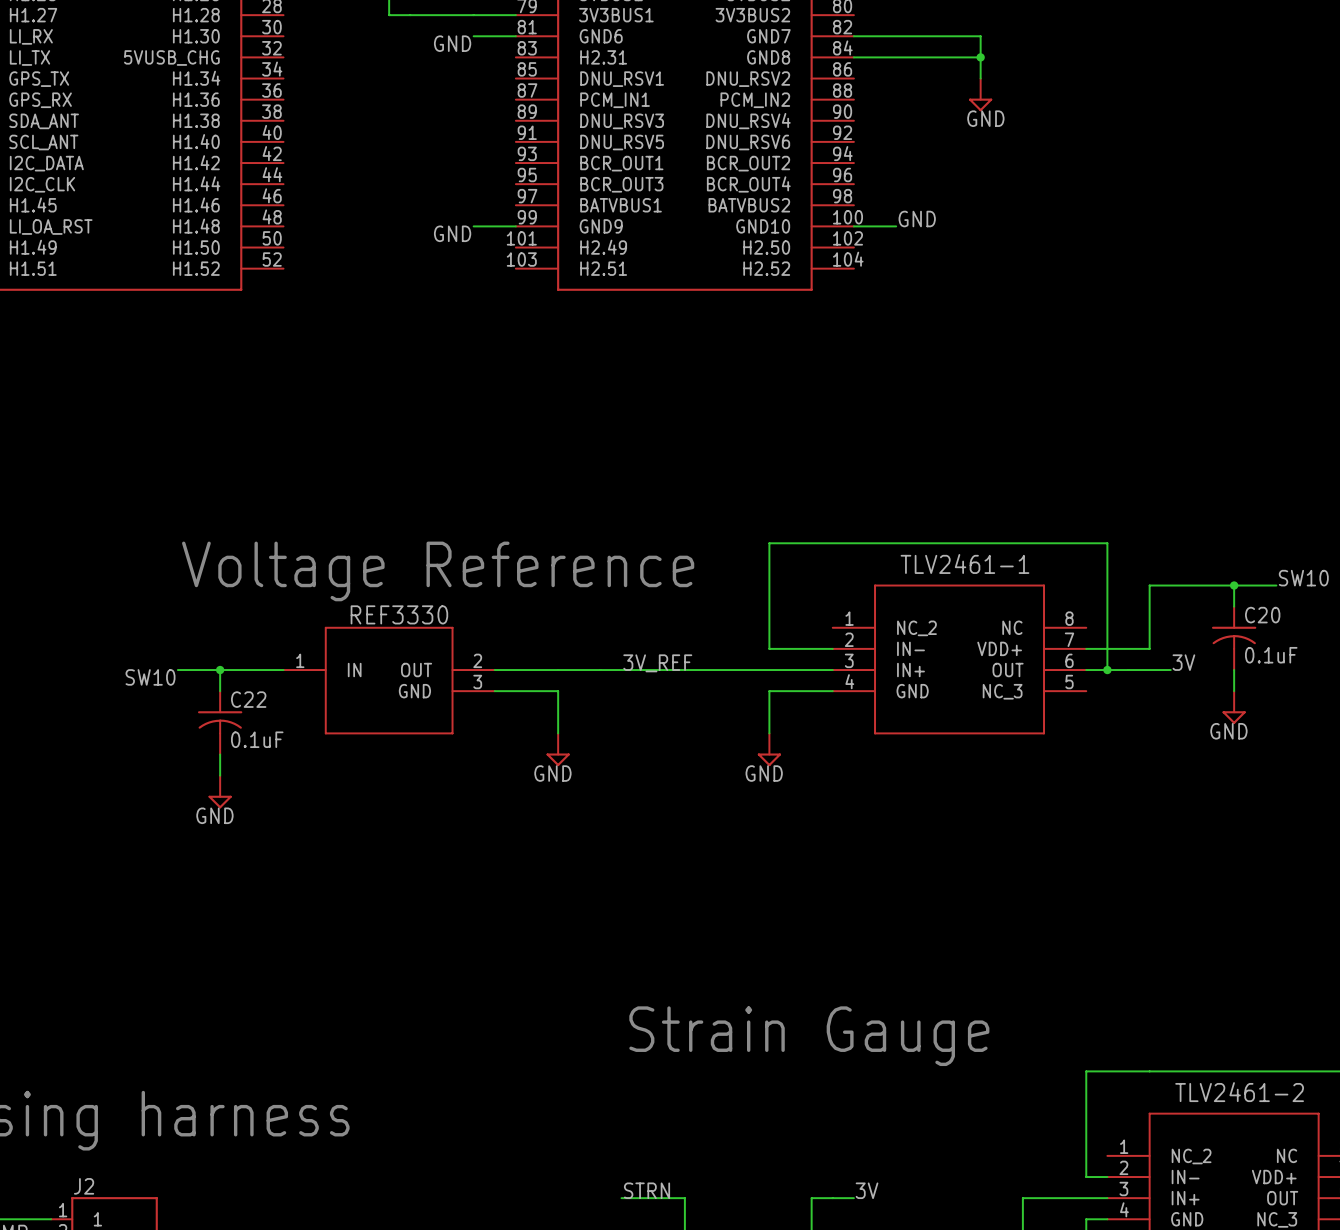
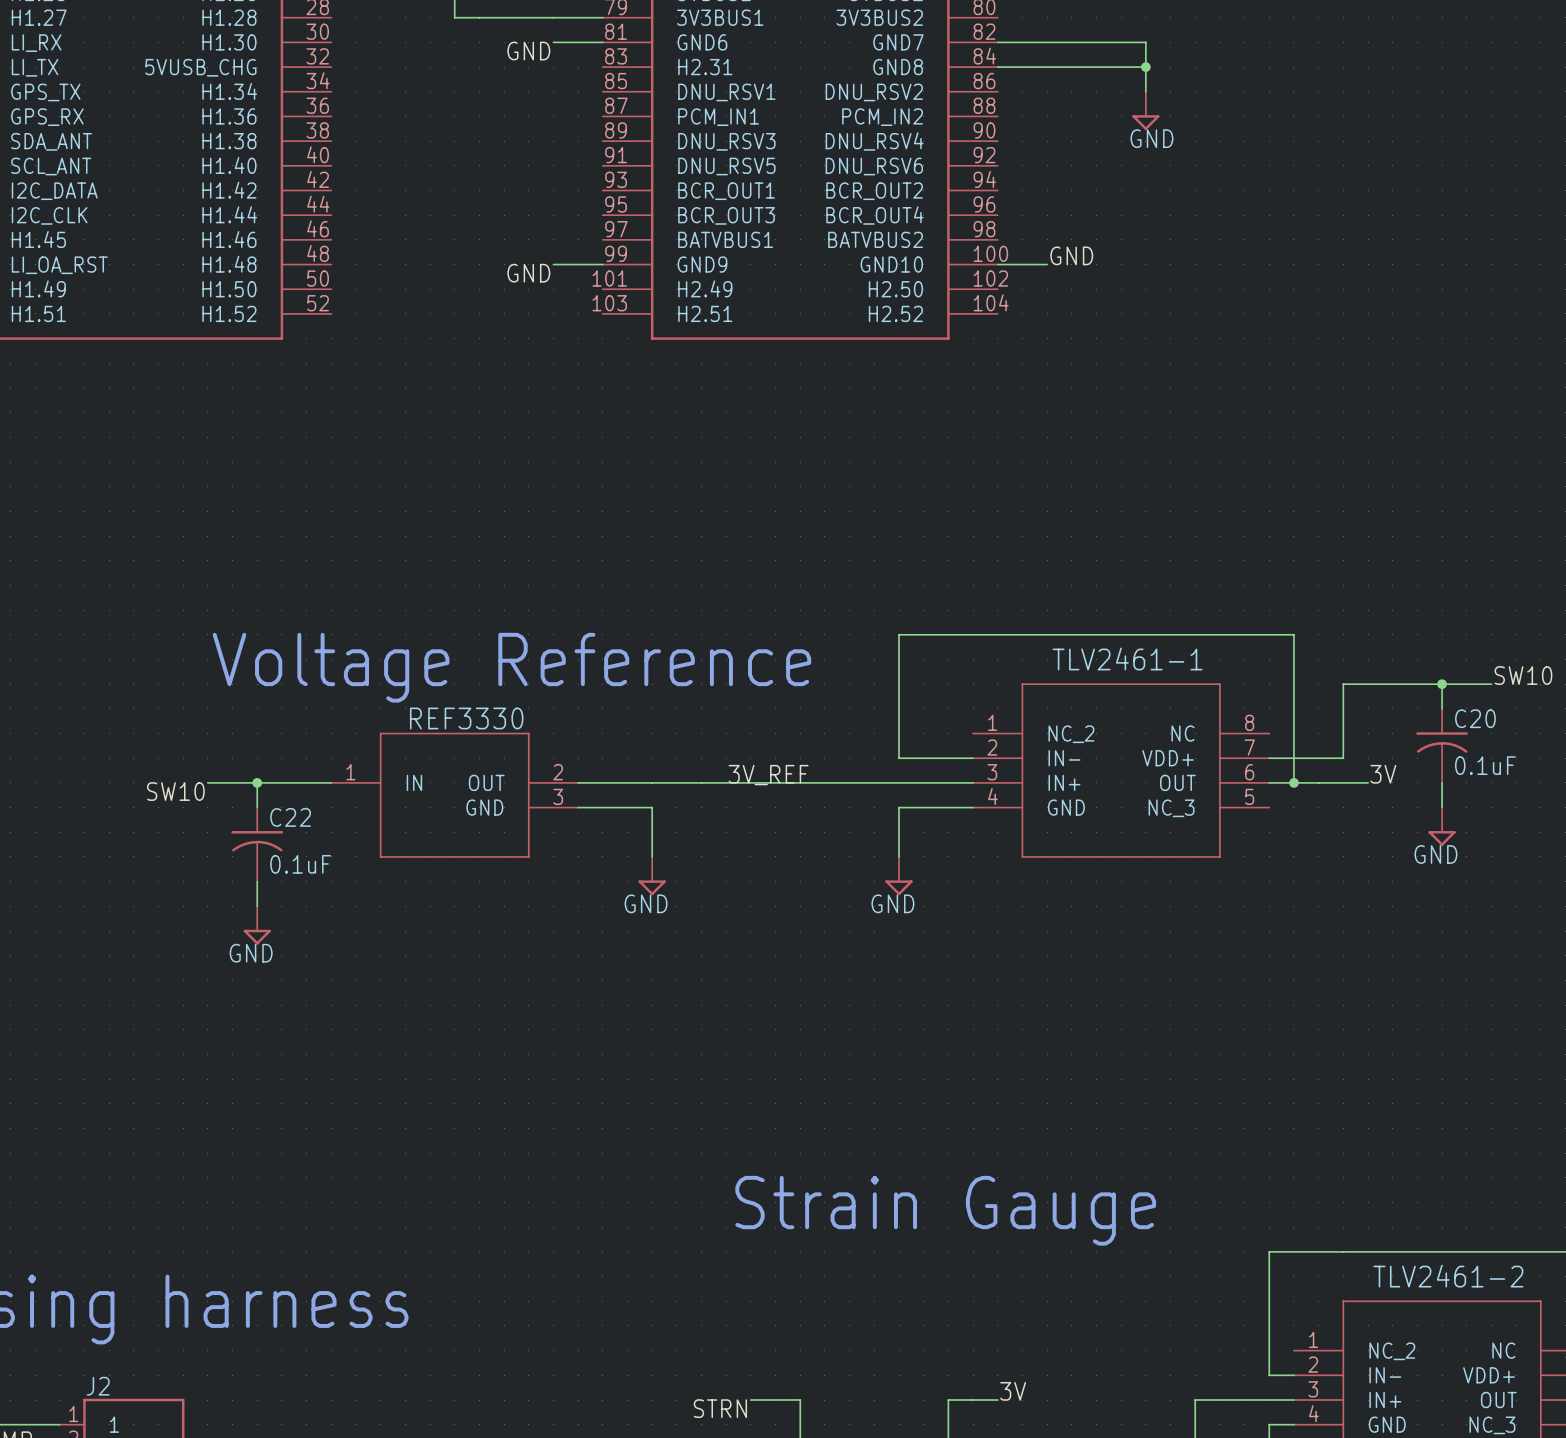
label position: STRN (647, 1190) -> STRN (720, 1408)
wire: (621, 1198) (642, 1198) -> none

